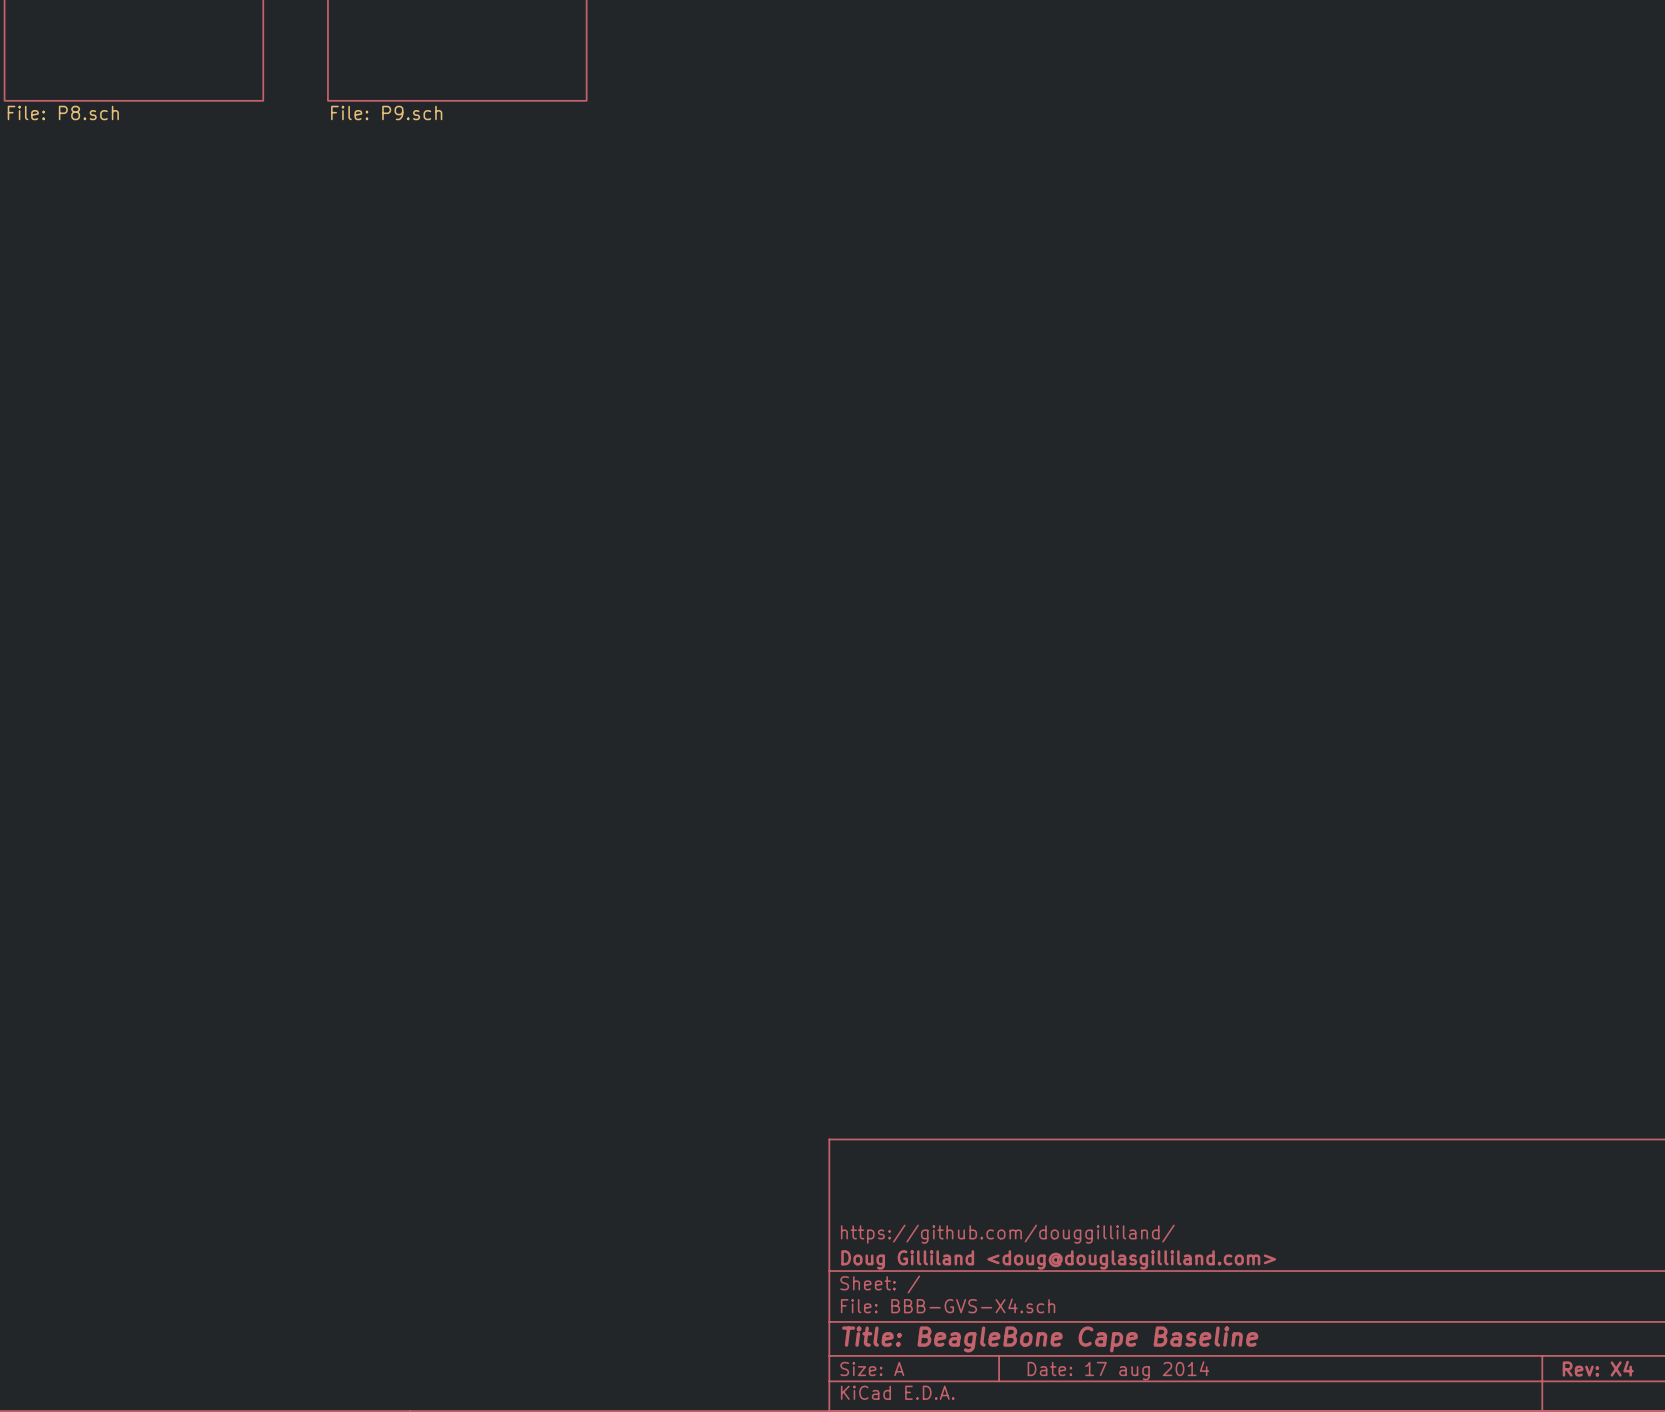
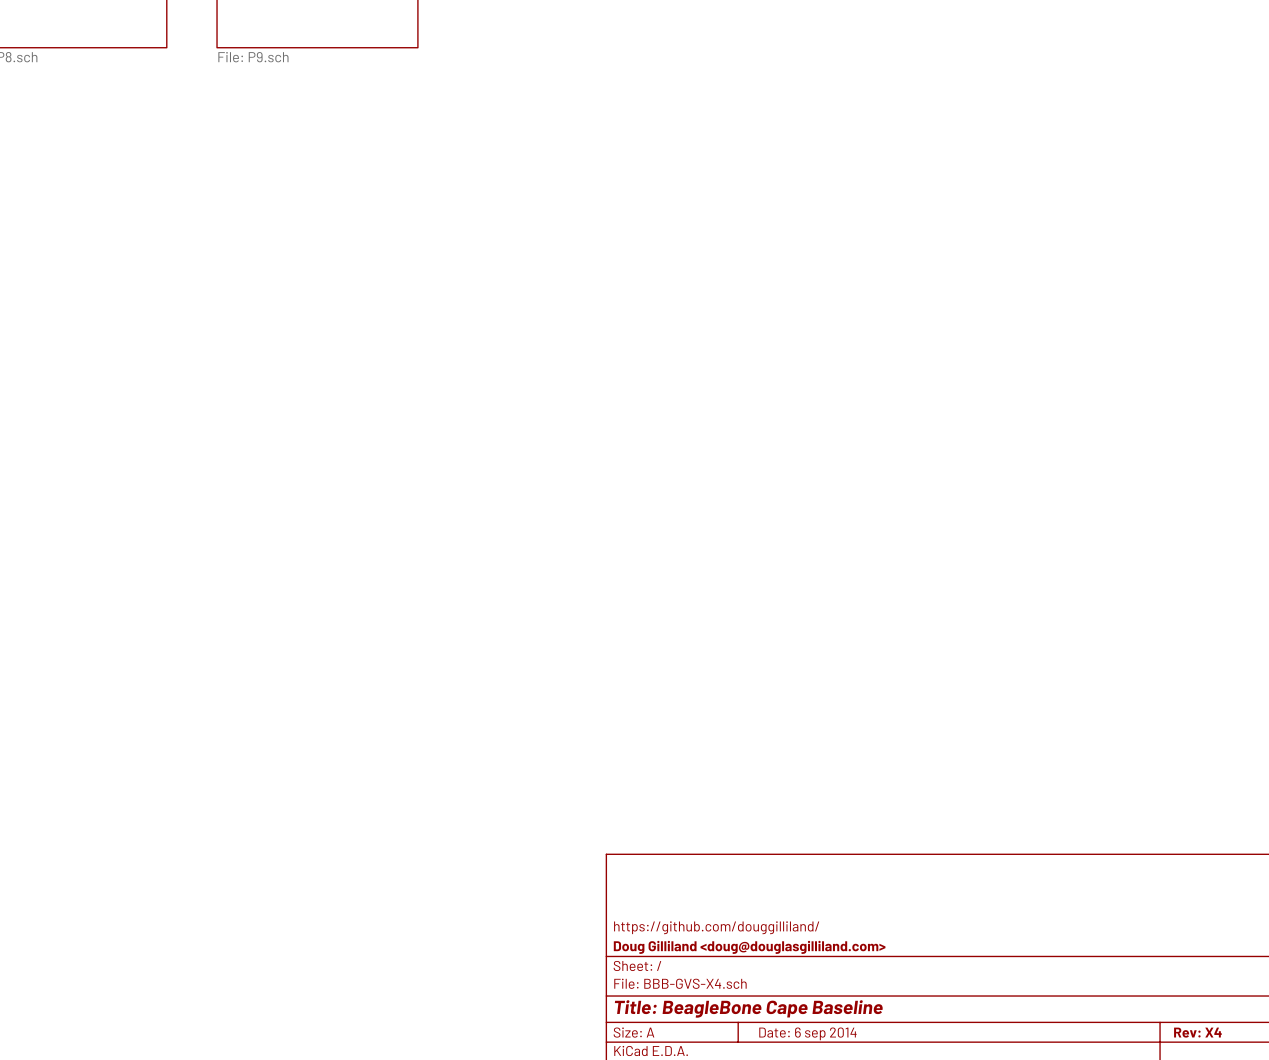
title block: Date: 17 aug 2014 (1118, 1370) -> Date: 6 sep 2014 (807, 1033)

